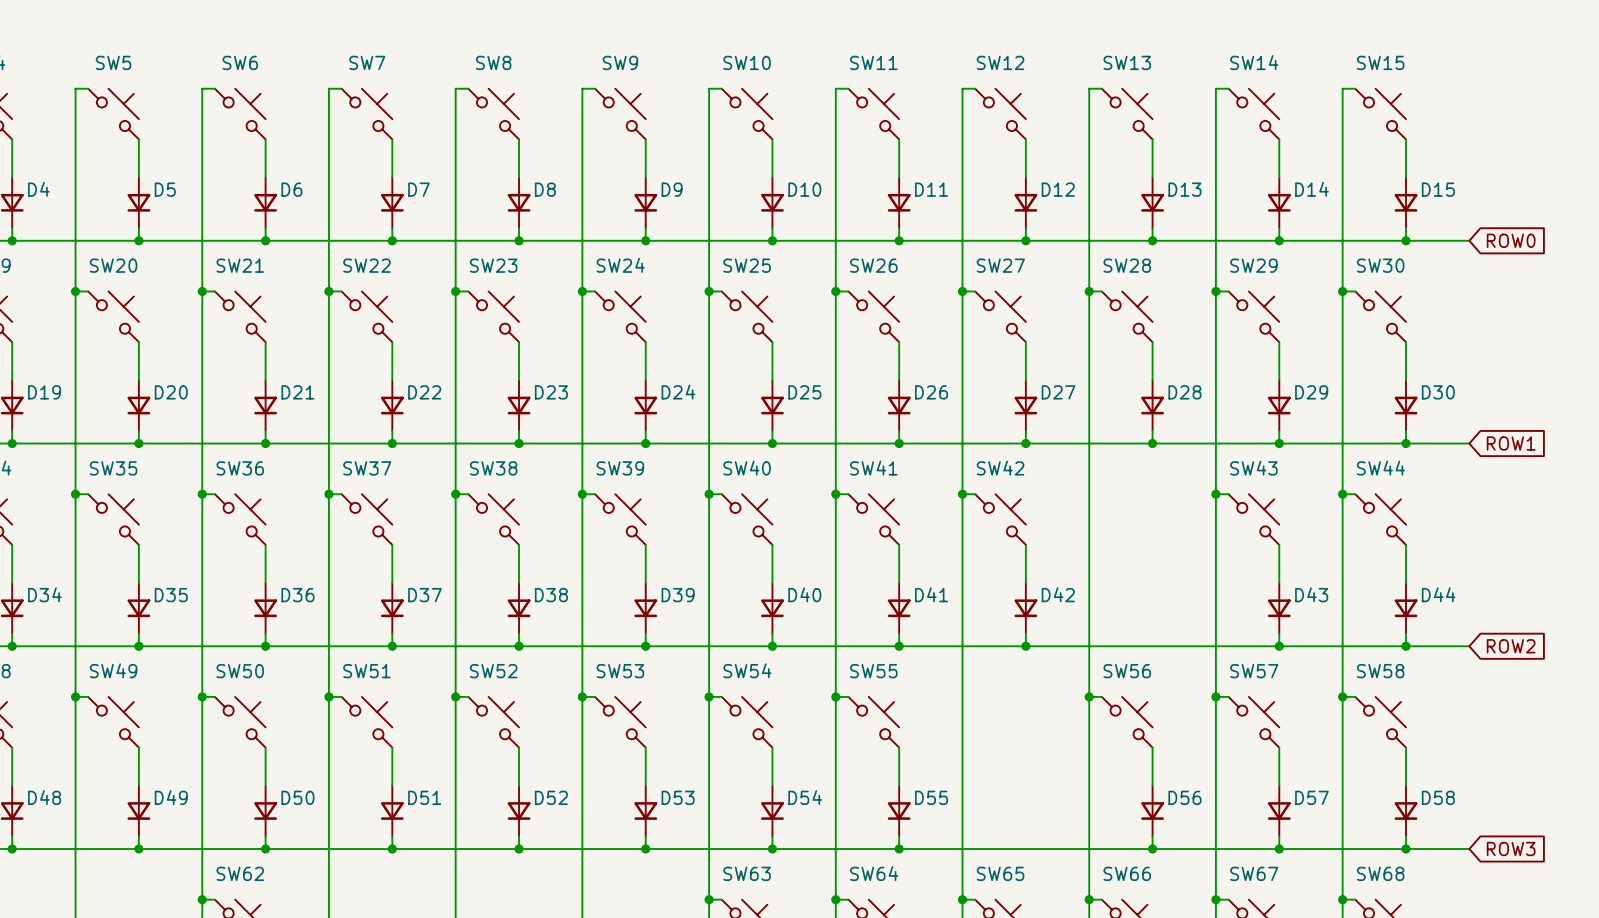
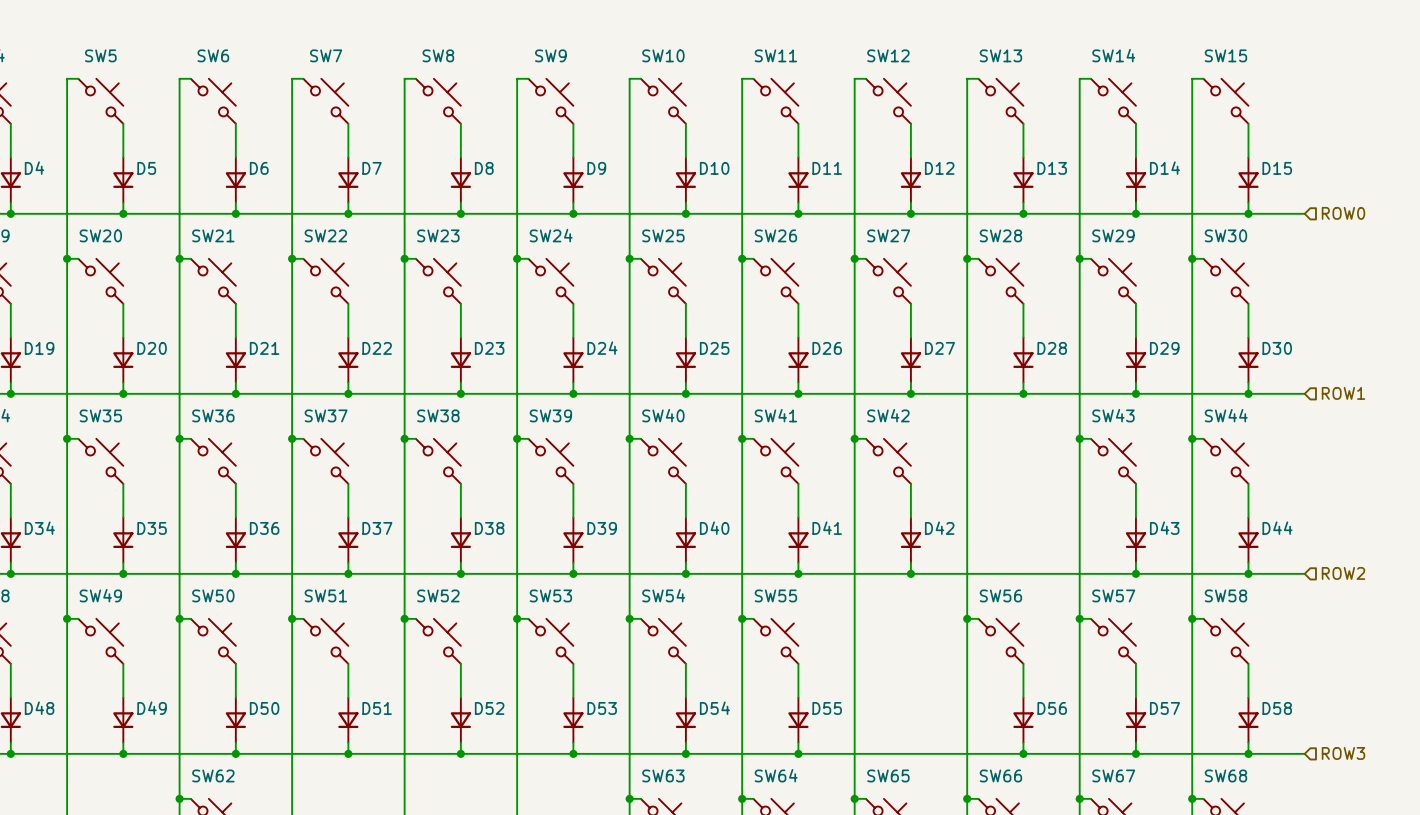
global label: ROW0 (1511, 240) -> none
hierarchical label: none -> ROW0 (1343, 213)
global label: ROW1 (1511, 443) -> none
hierarchical label: none -> ROW1 (1343, 393)
hierarchical label: none -> ROW2 (1343, 573)
global label: ROW2 (1511, 646) -> none
hierarchical label: none -> ROW3 (1343, 753)
global label: ROW3 (1511, 849) -> none

